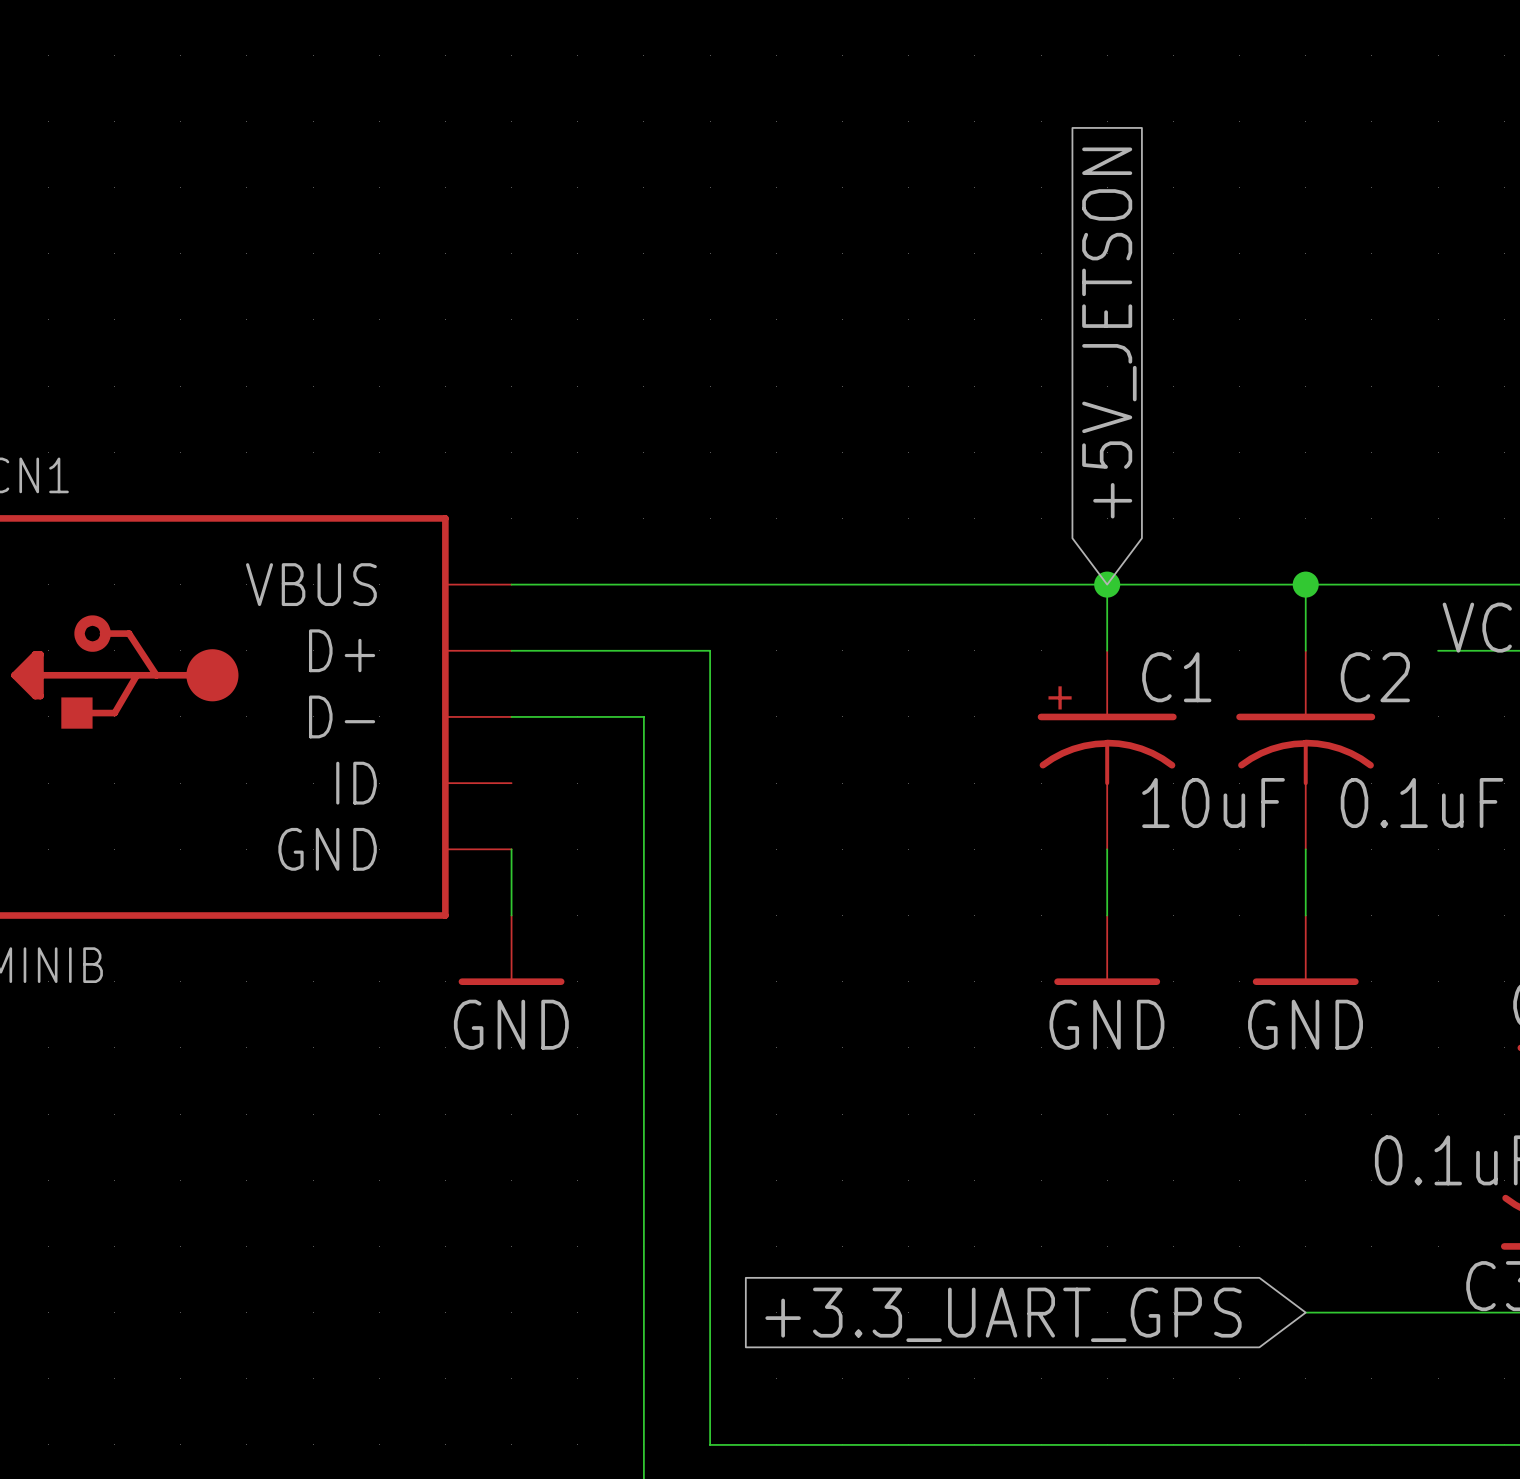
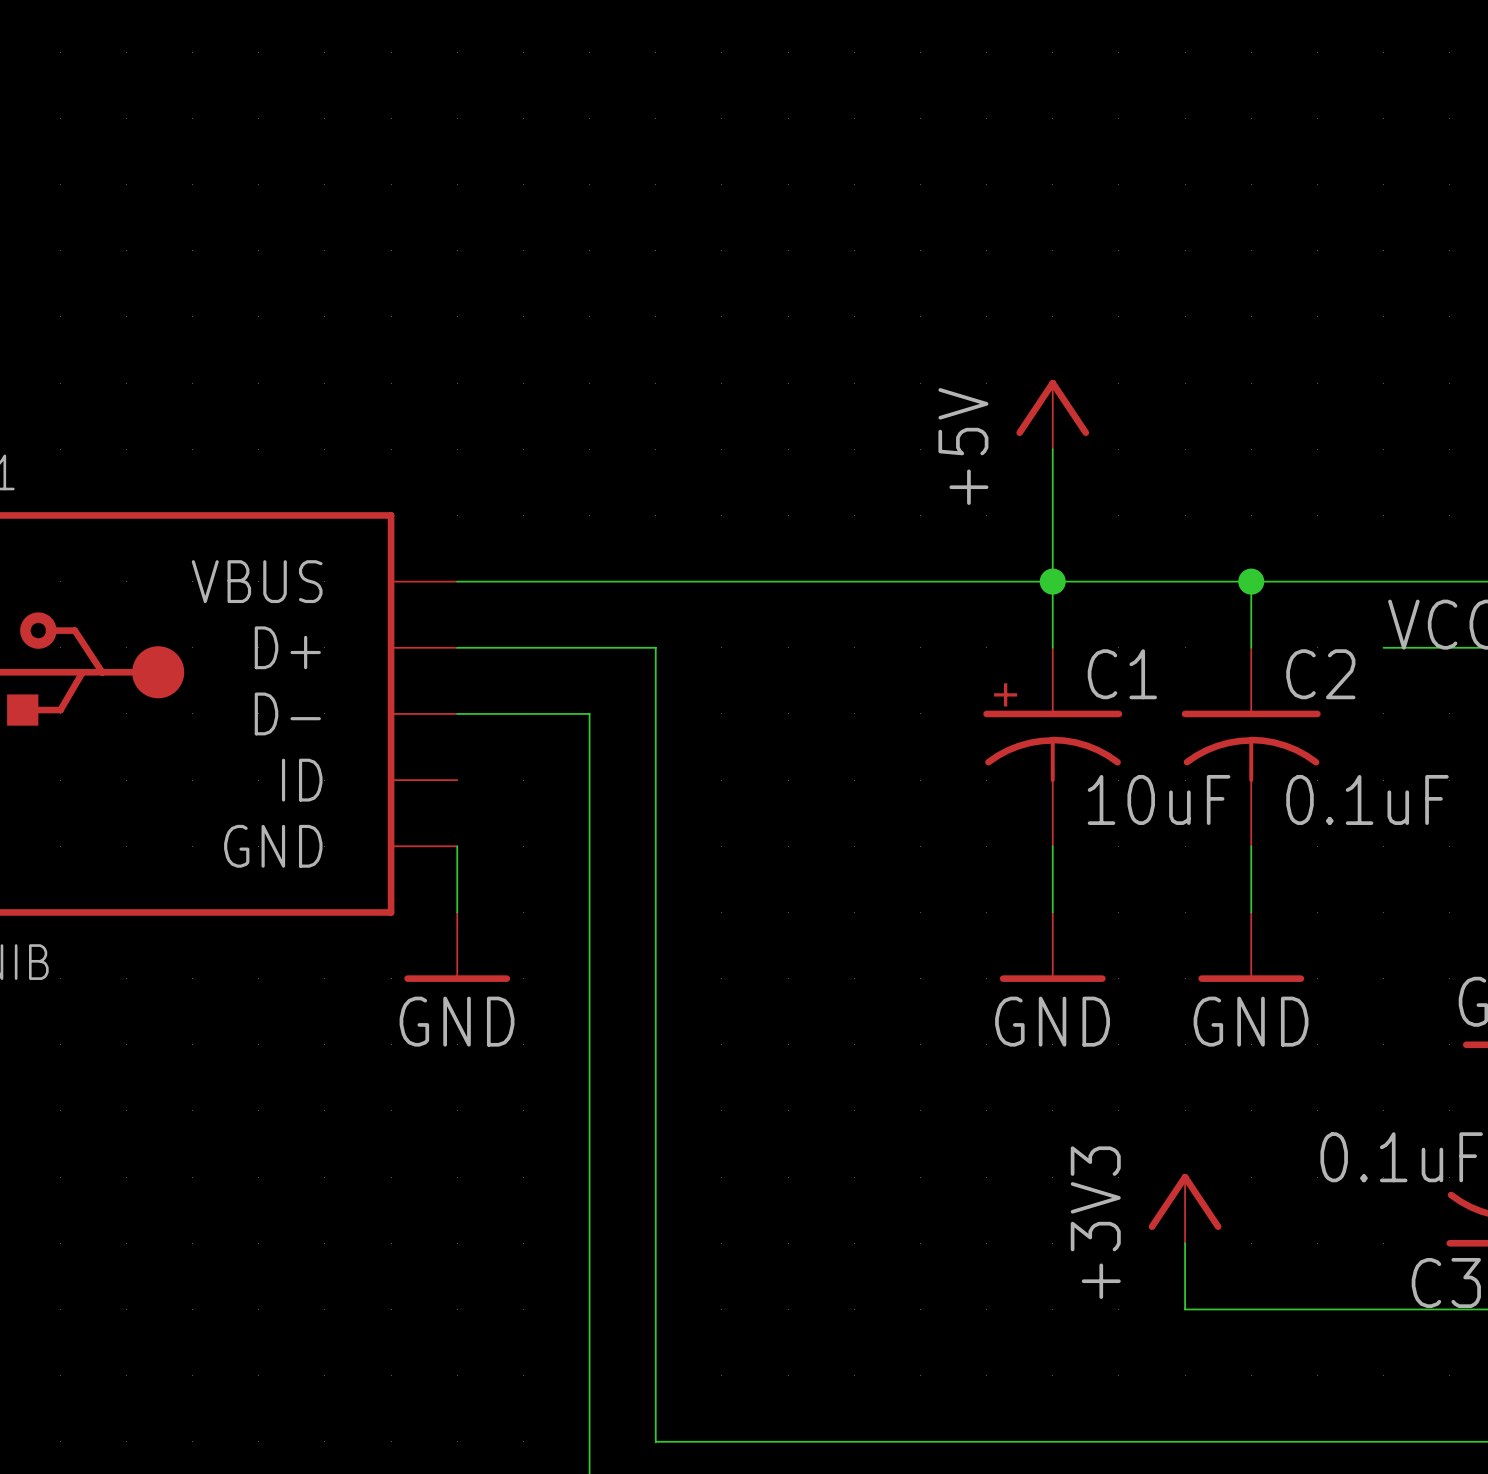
global label: +5V_JETSON (1109, 332) -> none
power symbol: none -> +5V (1052, 414)
wire: none -> (1052, 449) (1052, 581)
power symbol: none -> +3V3 (1185, 1208)
wire: none -> (1185, 1243) (1185, 1309) (1251, 1309)
global label: +3.3_UART_GPS (1003, 1314) -> none

